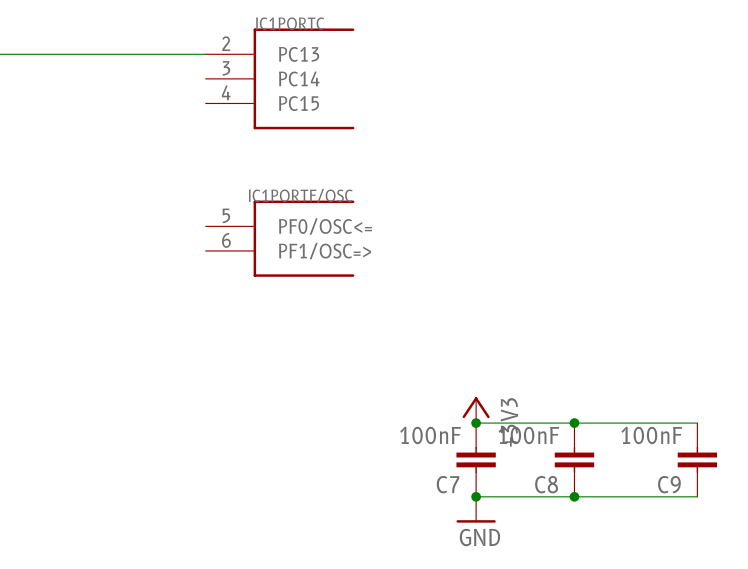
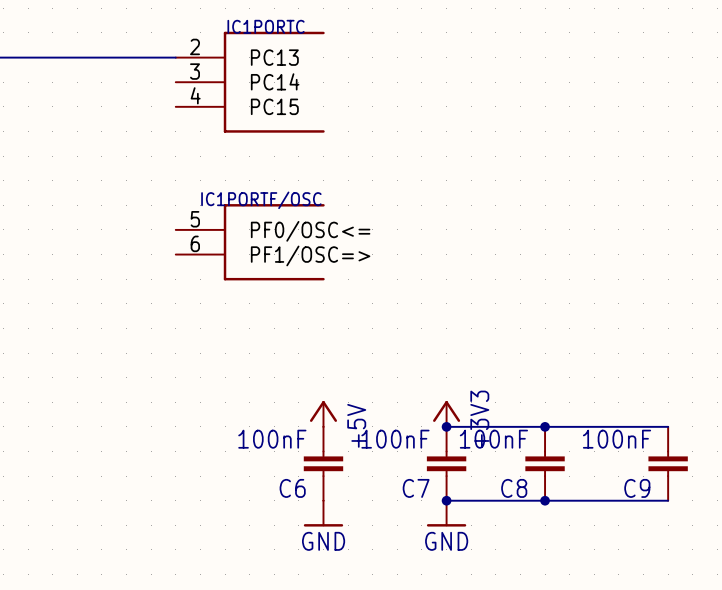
power symbol: none -> +5V (323, 413)
C6: none -> 100nF (323, 463)
power symbol: none -> GND (323, 513)

